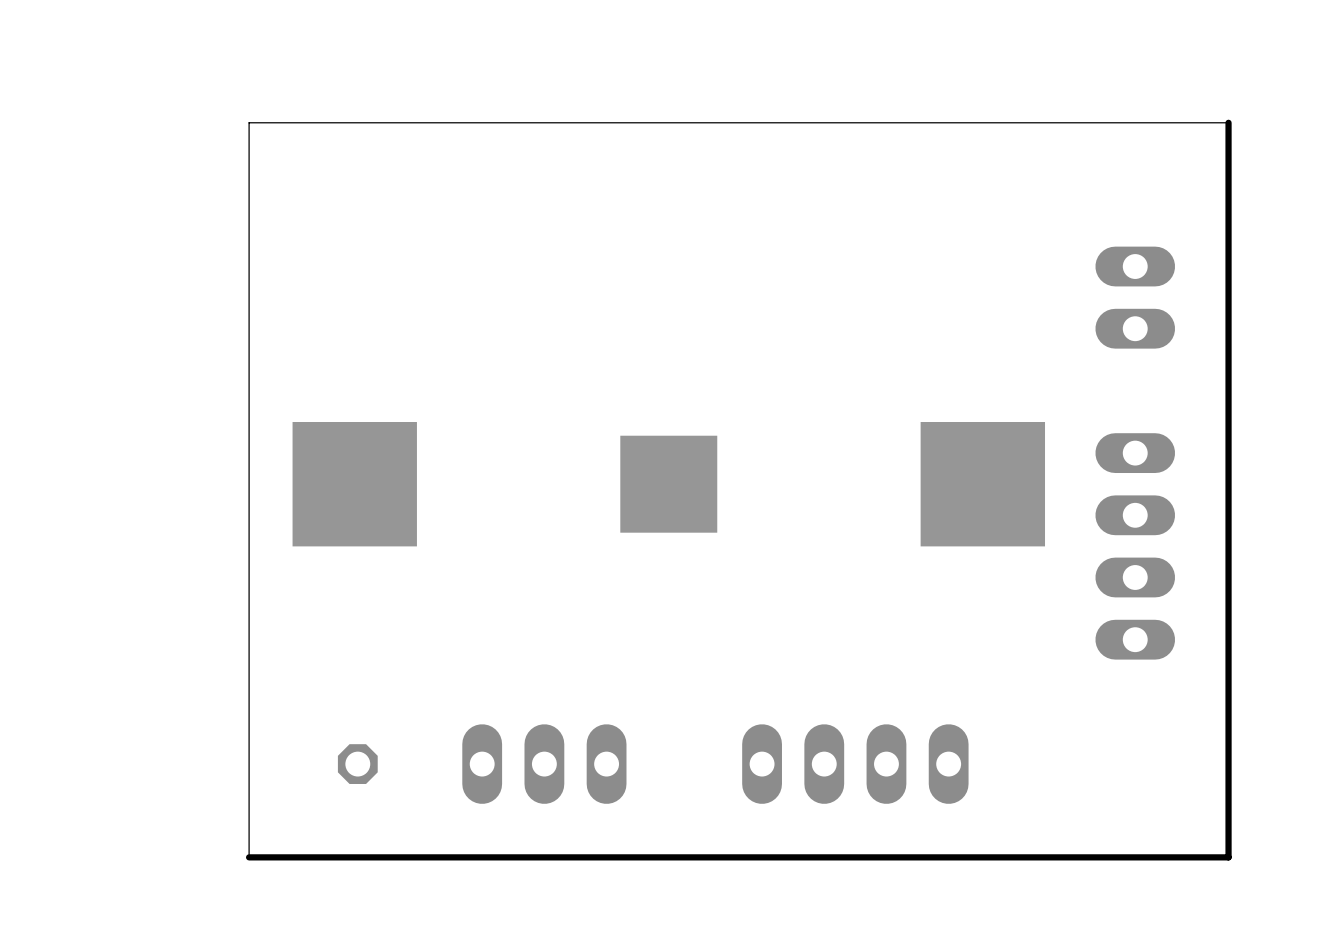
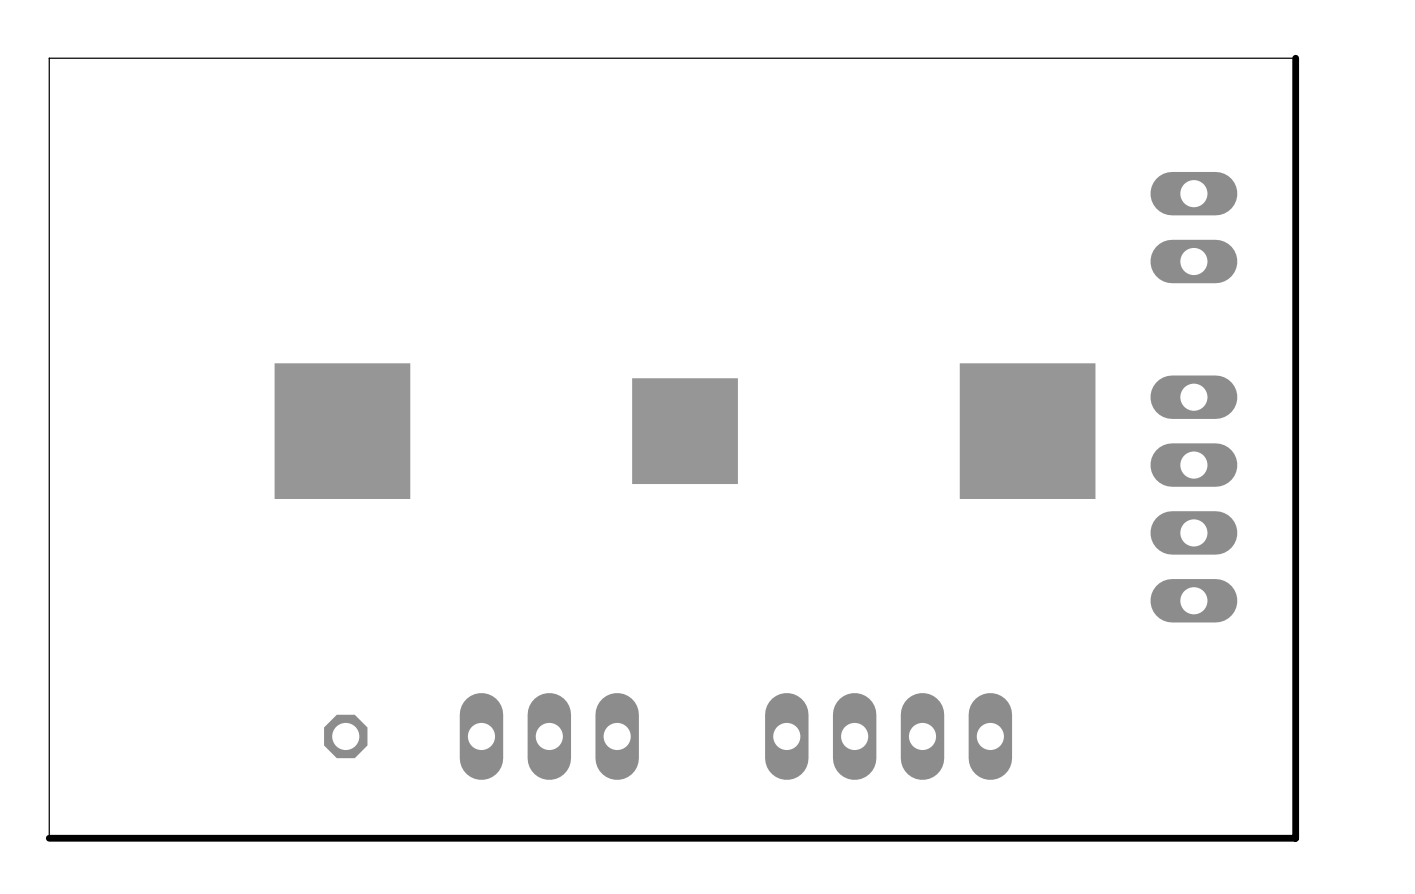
board edge: (1228, 142) (1228, 122) (249, 122) (249, 857) -> (1295, 58) (49, 58) (49, 838) (227, 838)

